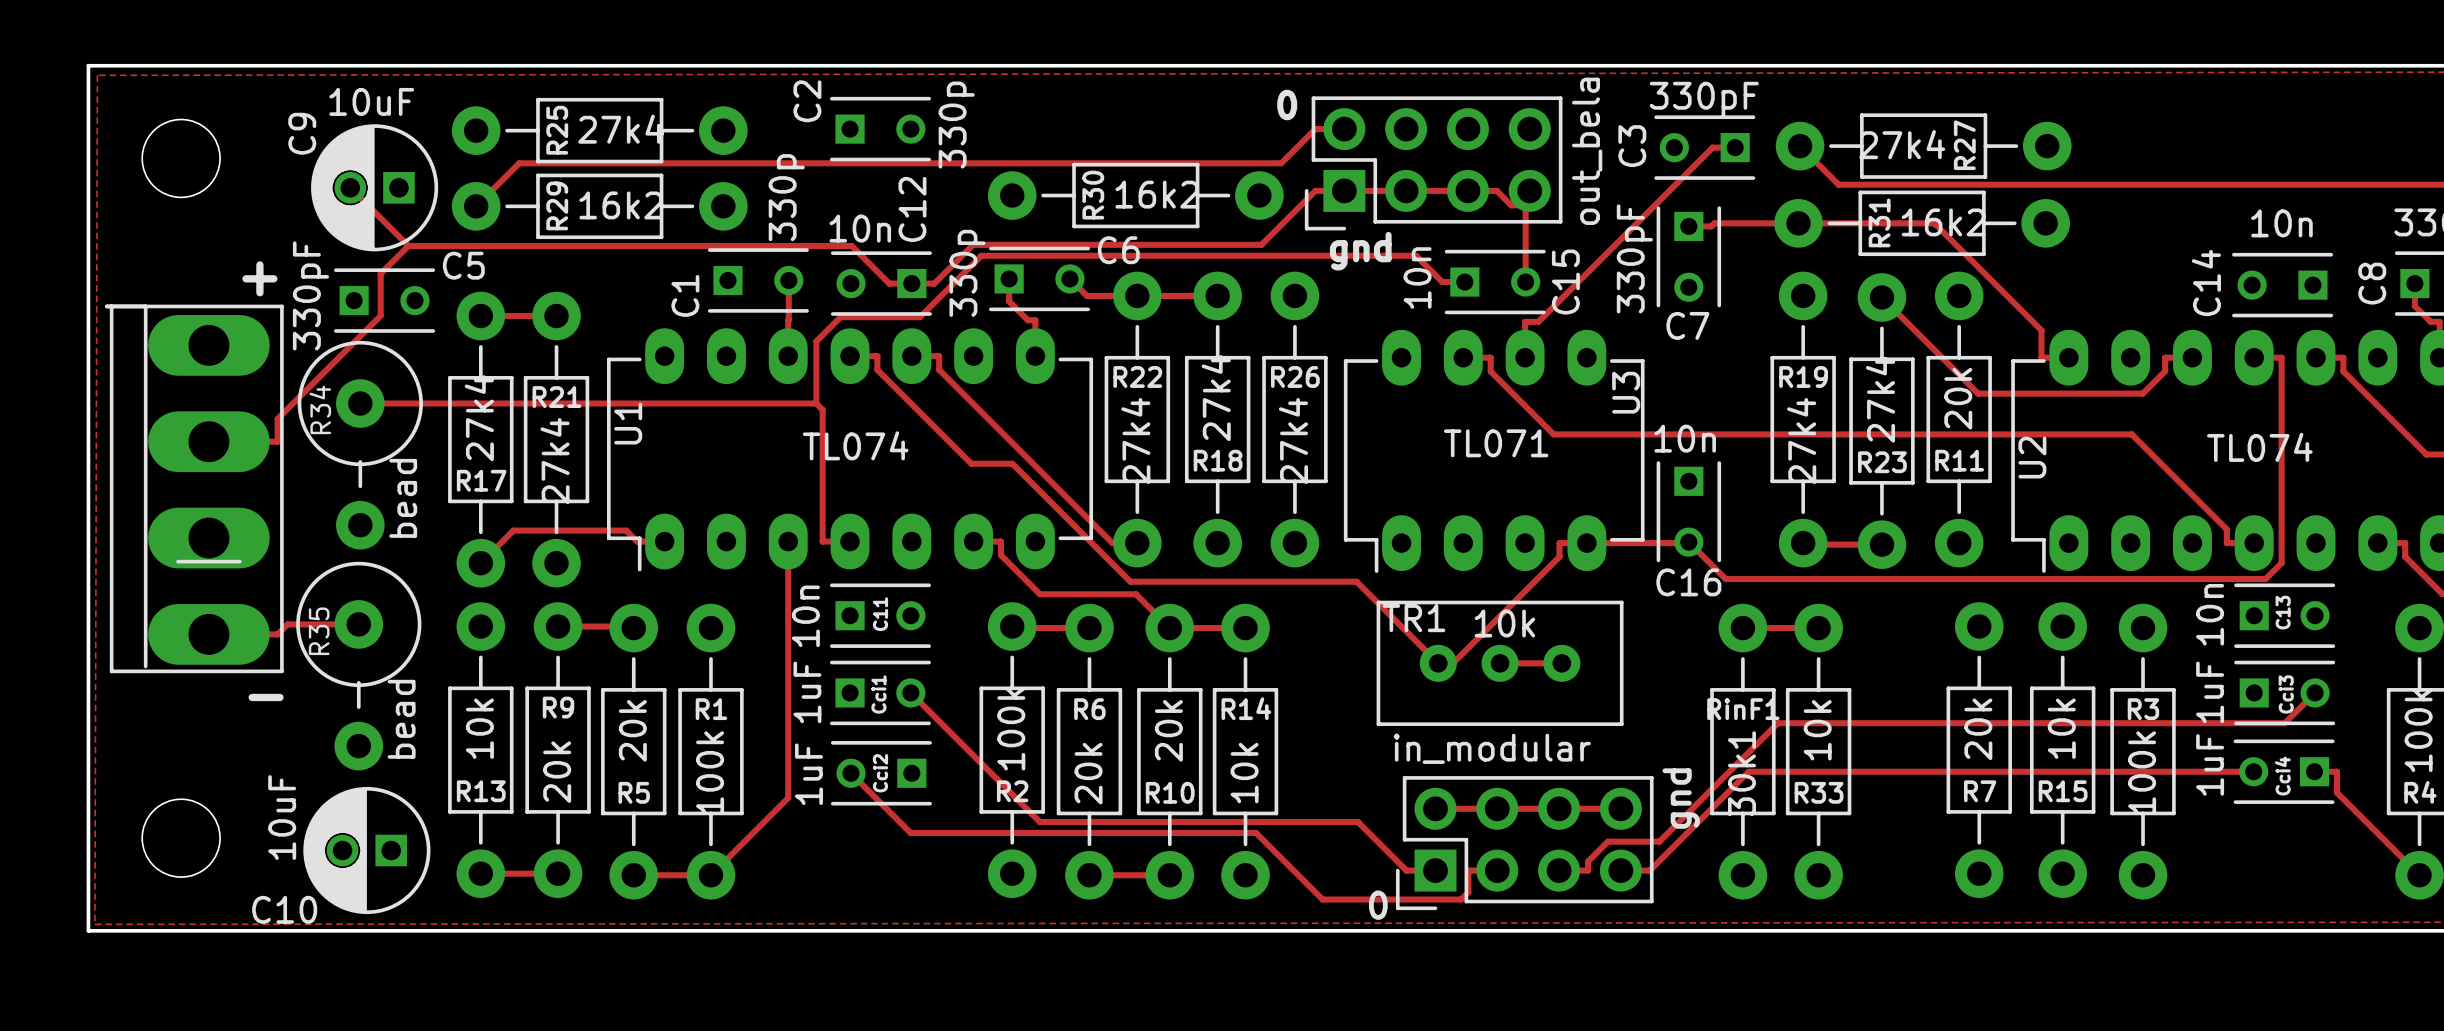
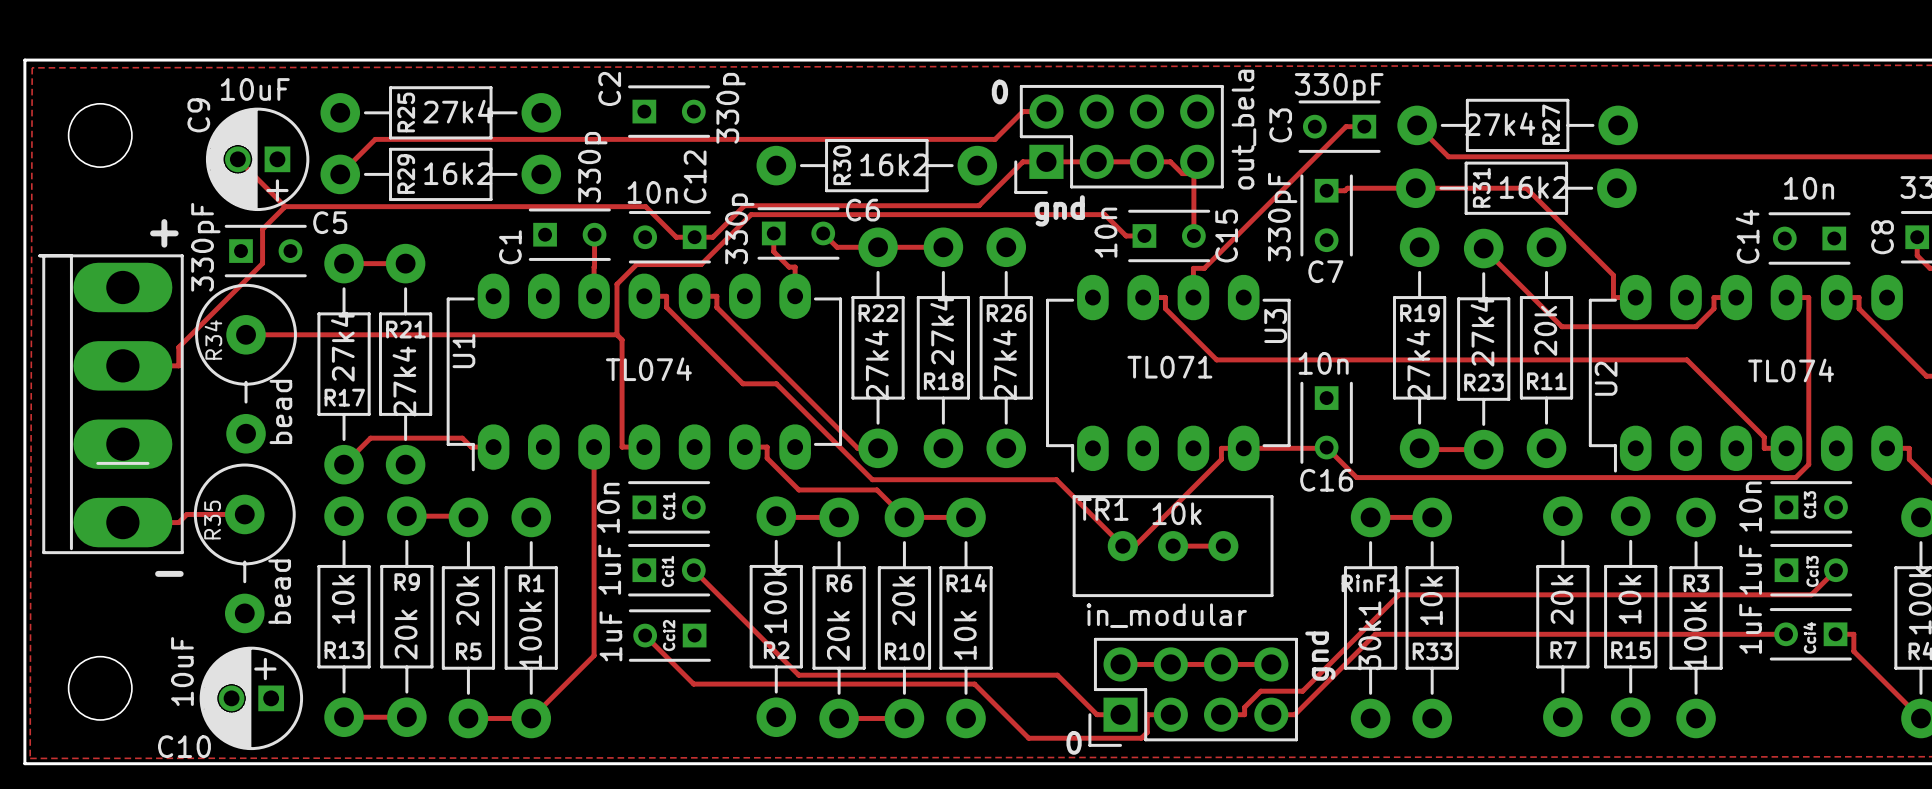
text: none -> + (277, 190)
text: none -> + (265, 669)

